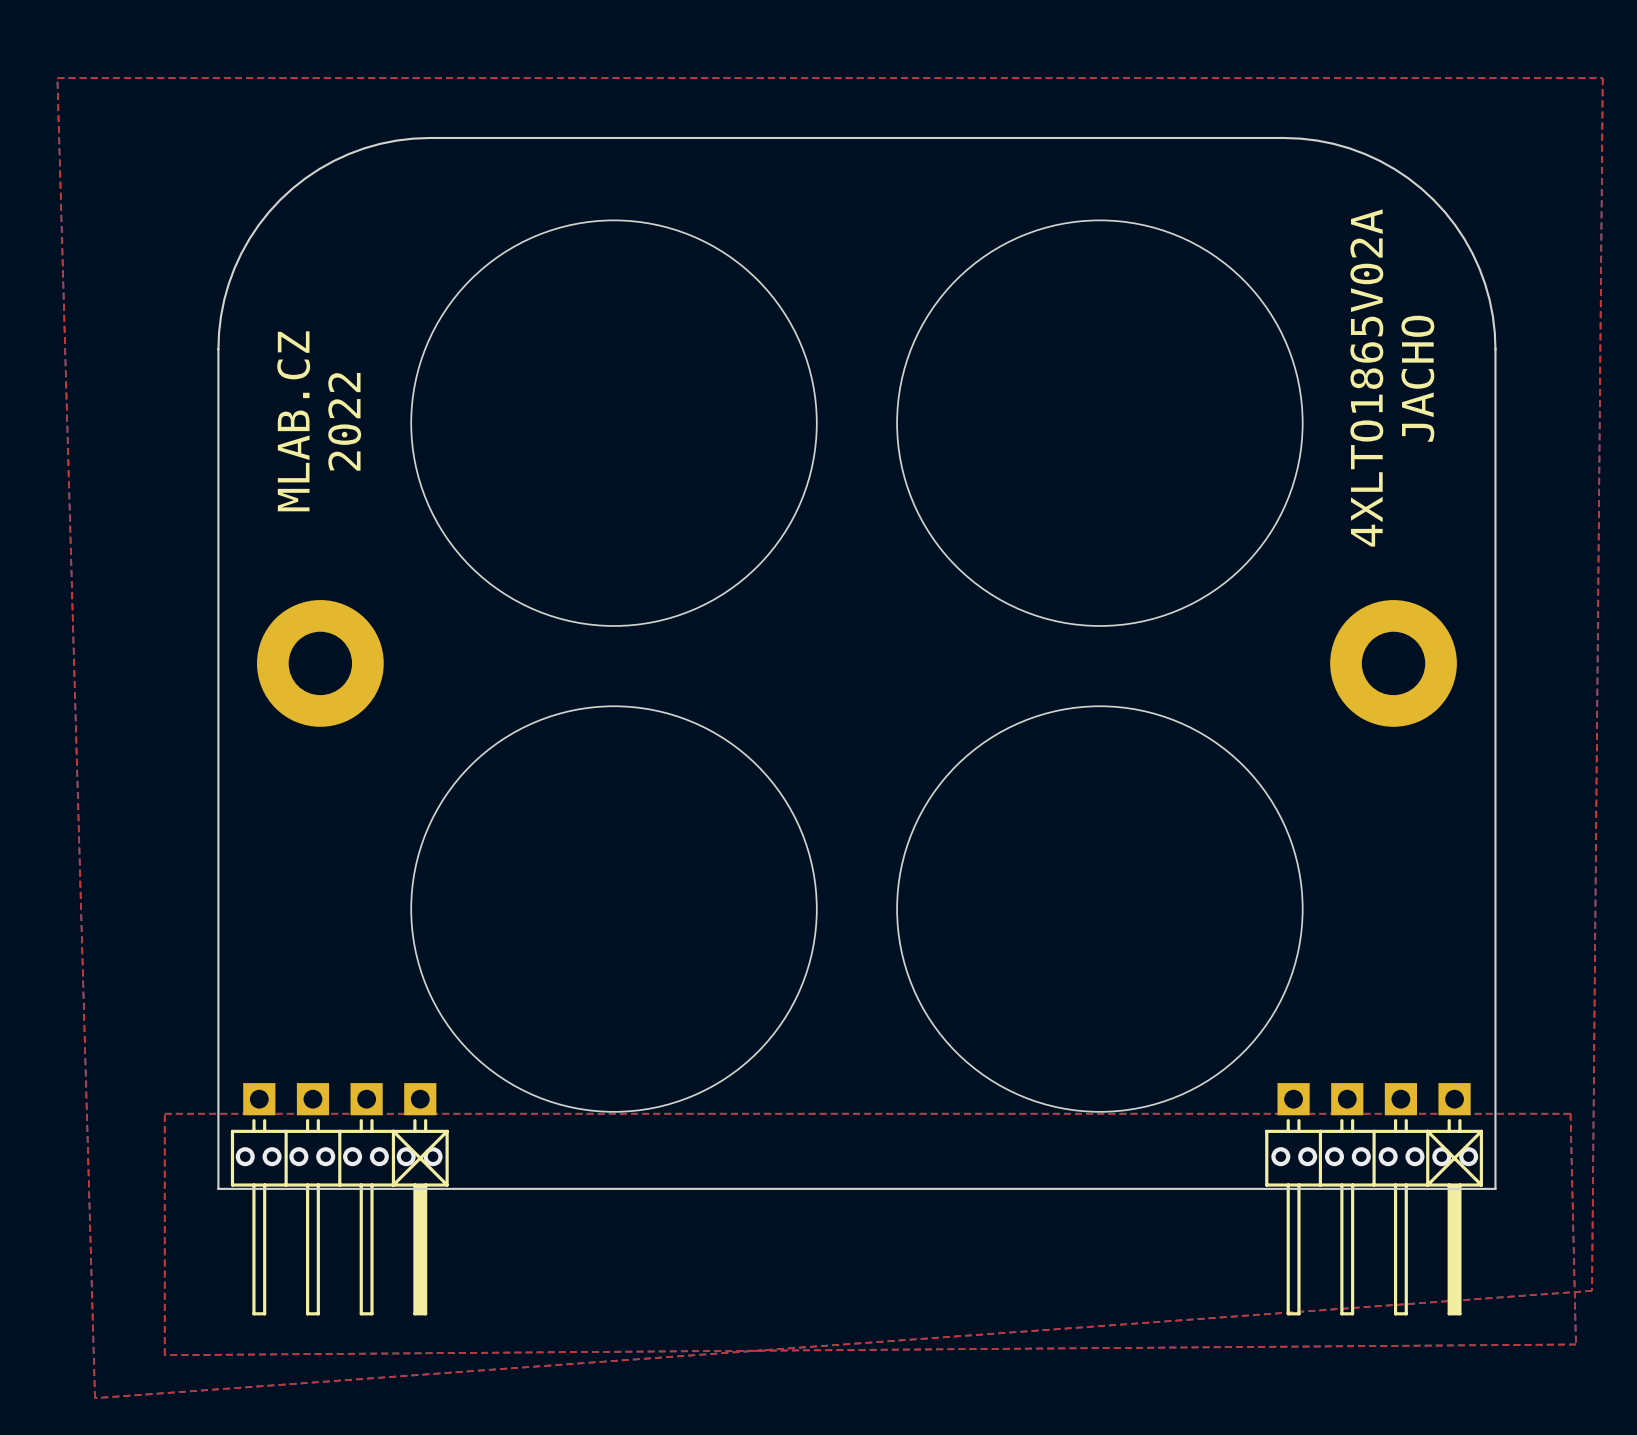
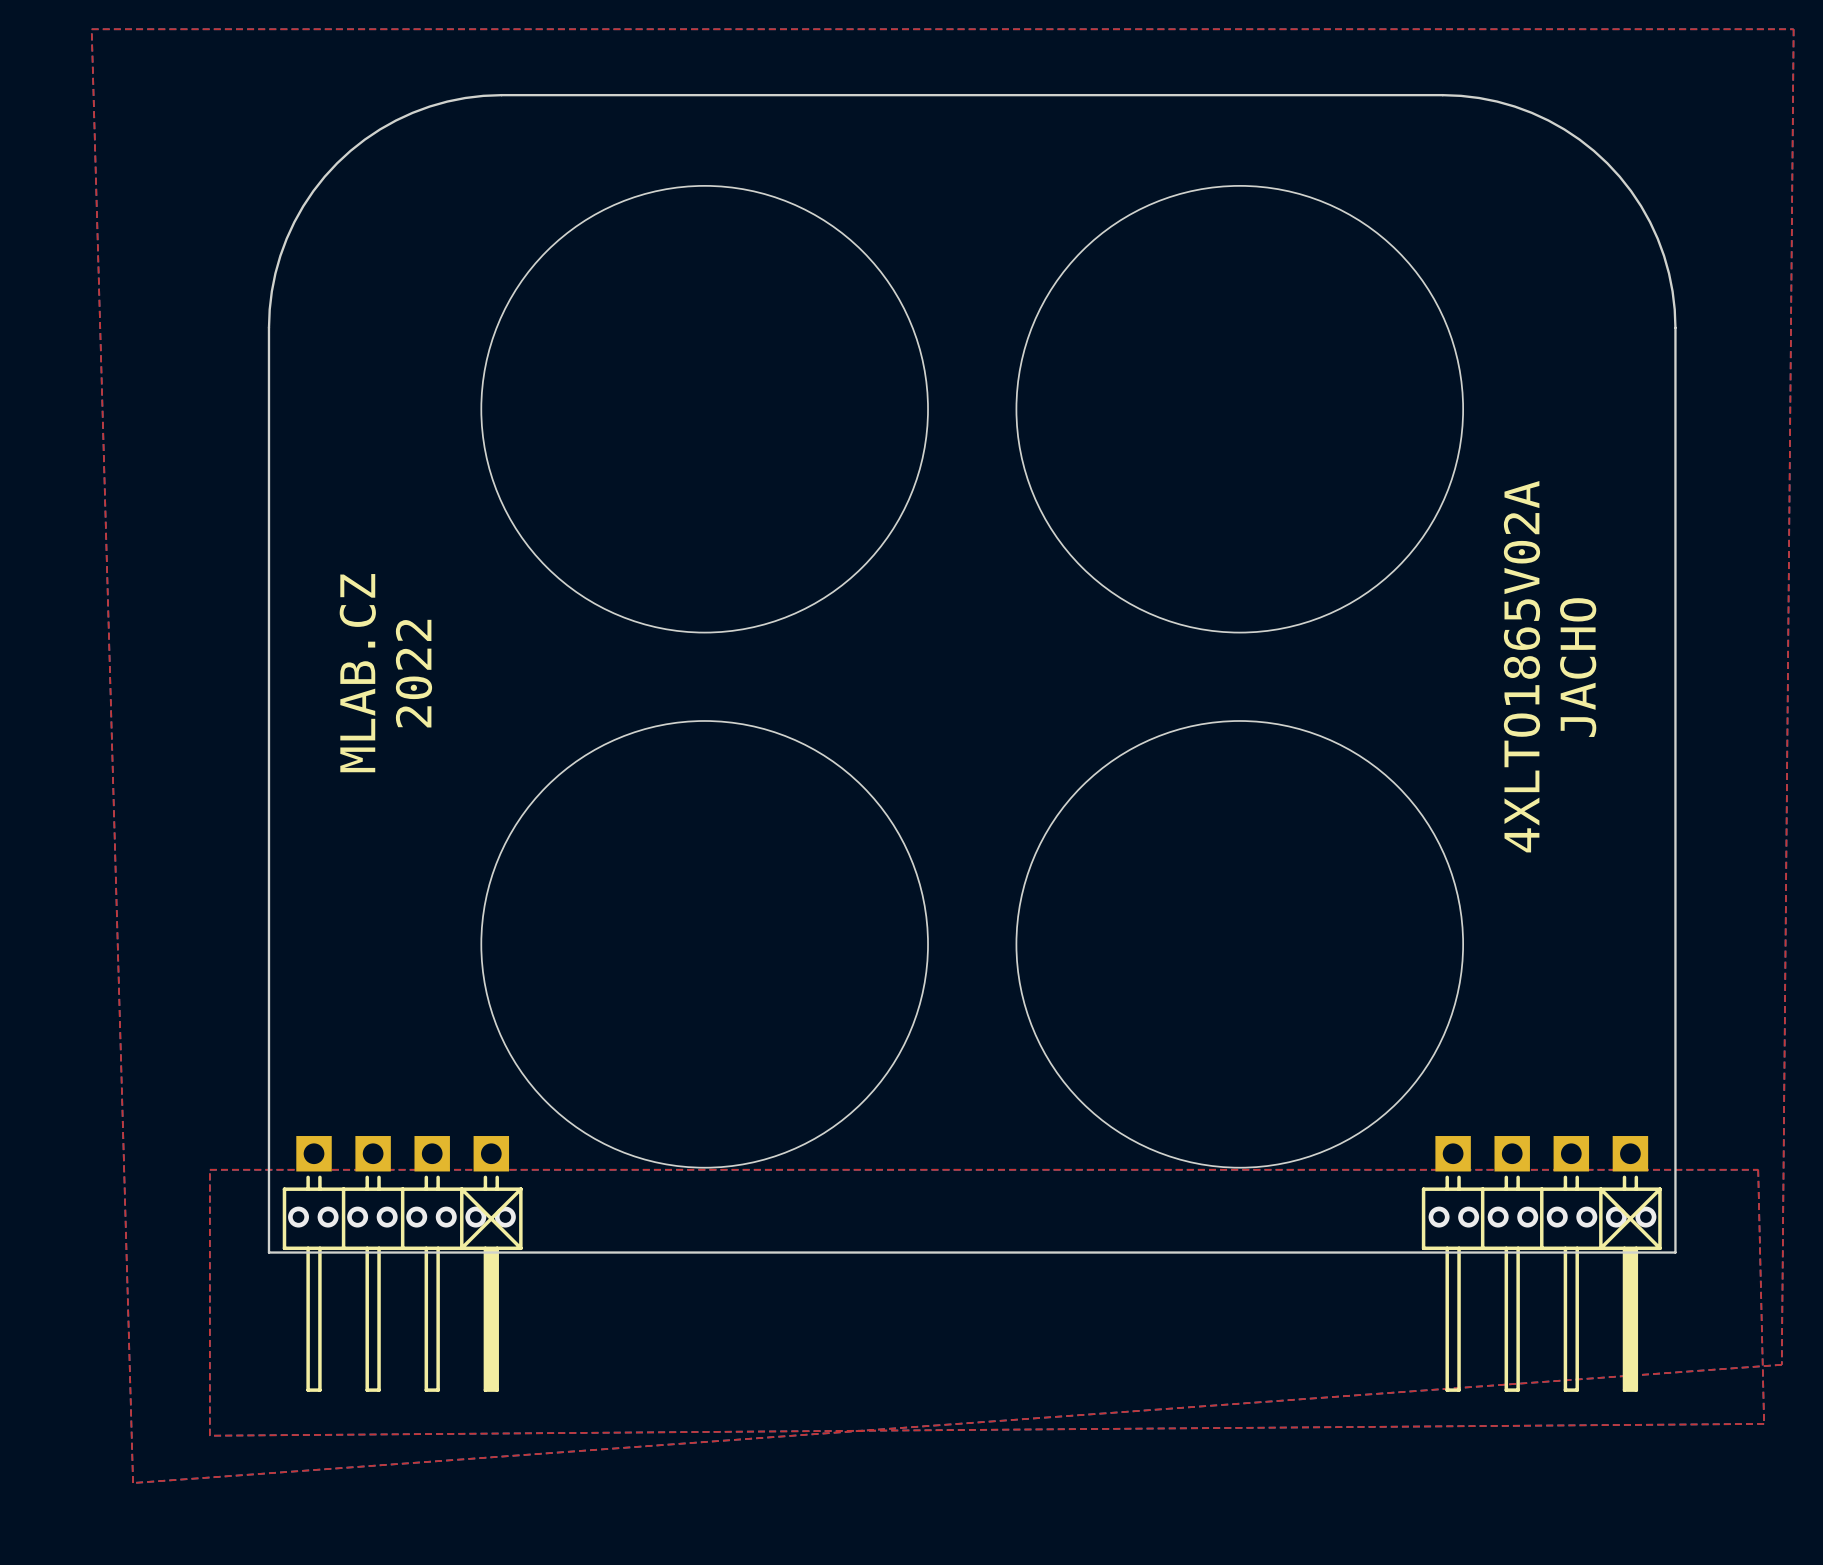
text position: 4XLTO1865V02A (1366, 377) -> 4XLTO1865V02A (1521, 666)
text position: JACHO (1417, 378) -> JACHO (1578, 667)
text position: MLAB.CZ (293, 421) -> MLAB.CZ (357, 673)
text position: 2022 (344, 421) -> 2022 (413, 673)
part: (320, 663) -> none
part: (1393, 663) -> none

